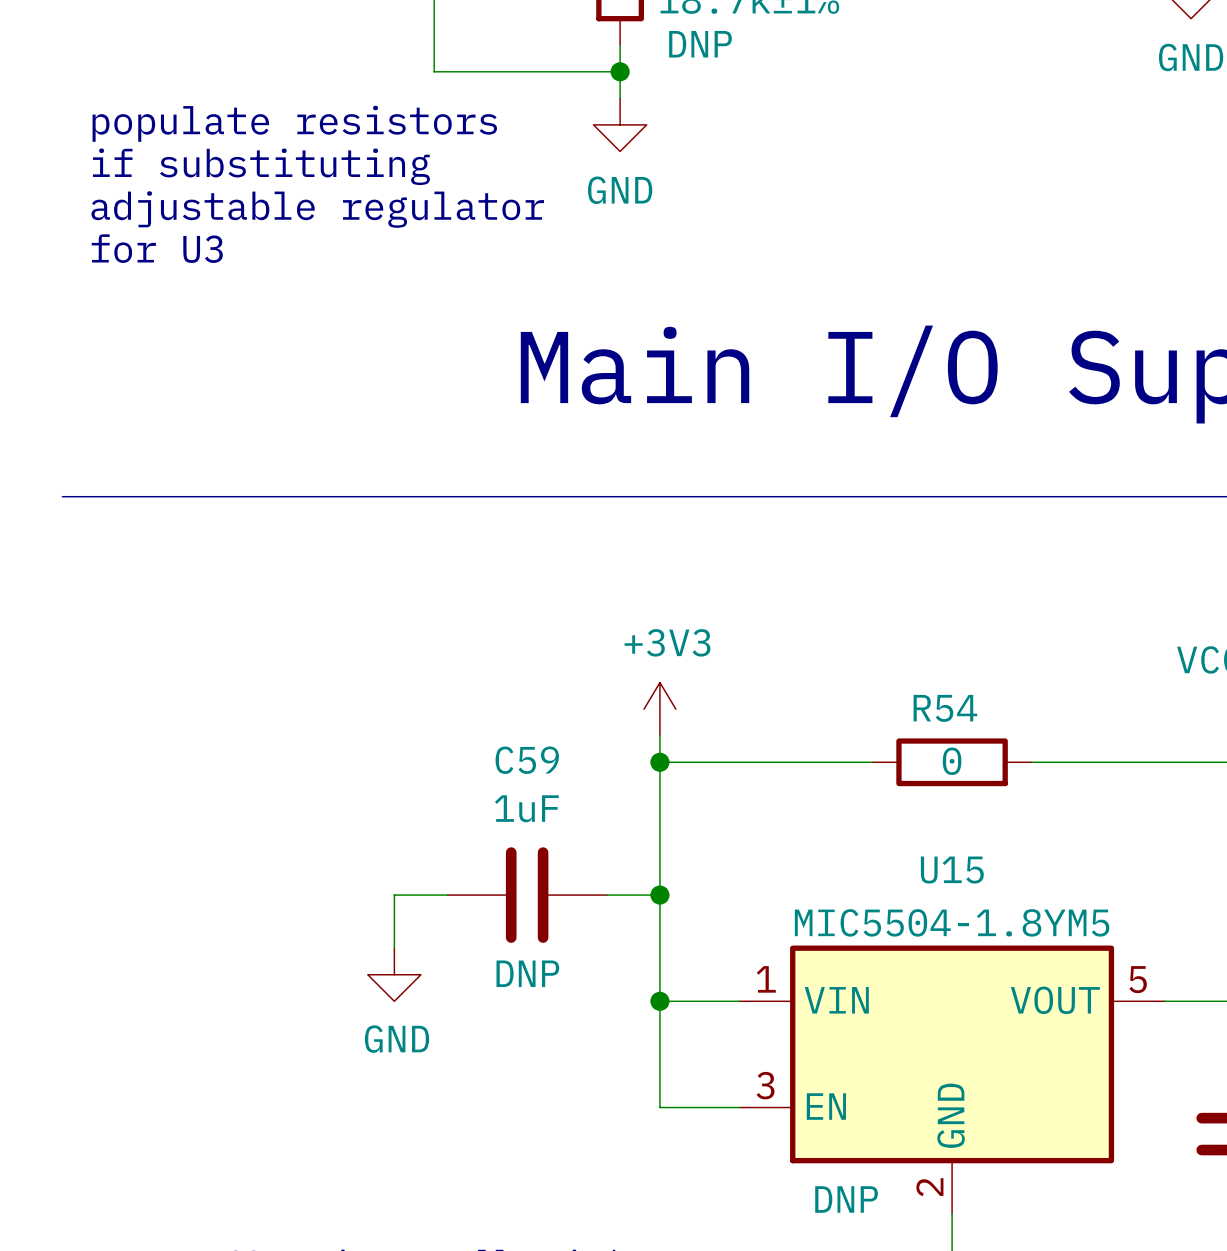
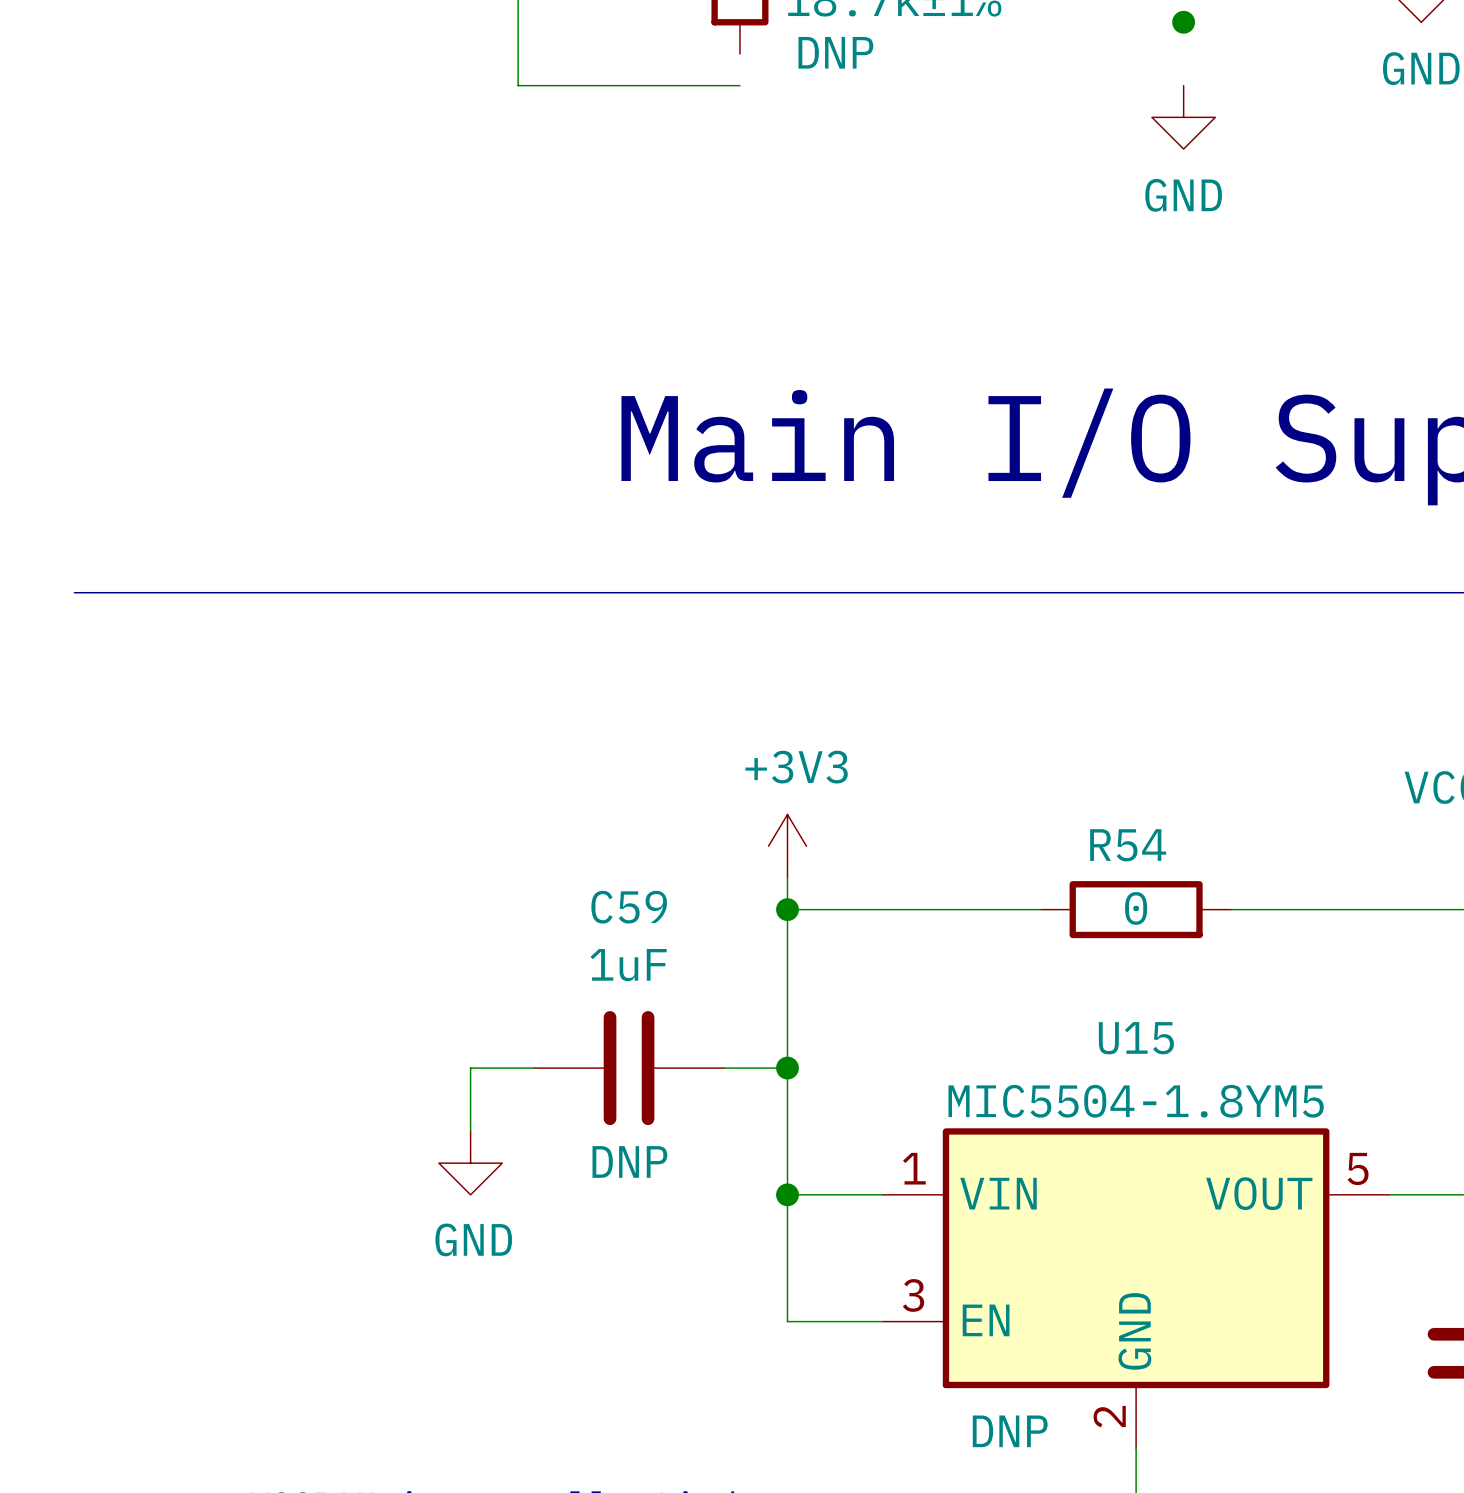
junction: none -> (1183, 22)
wire: (620, 45) (620, 98) -> none
junction: (620, 71) -> none
text: populate resistors (294, 123) -> none
power symbol position: GND (620, 124) -> GND (1183, 117)
text: if substituting (261, 166) -> none
text: adjustable regulator (317, 209) -> none
text: for U3 (157, 248) -> none

